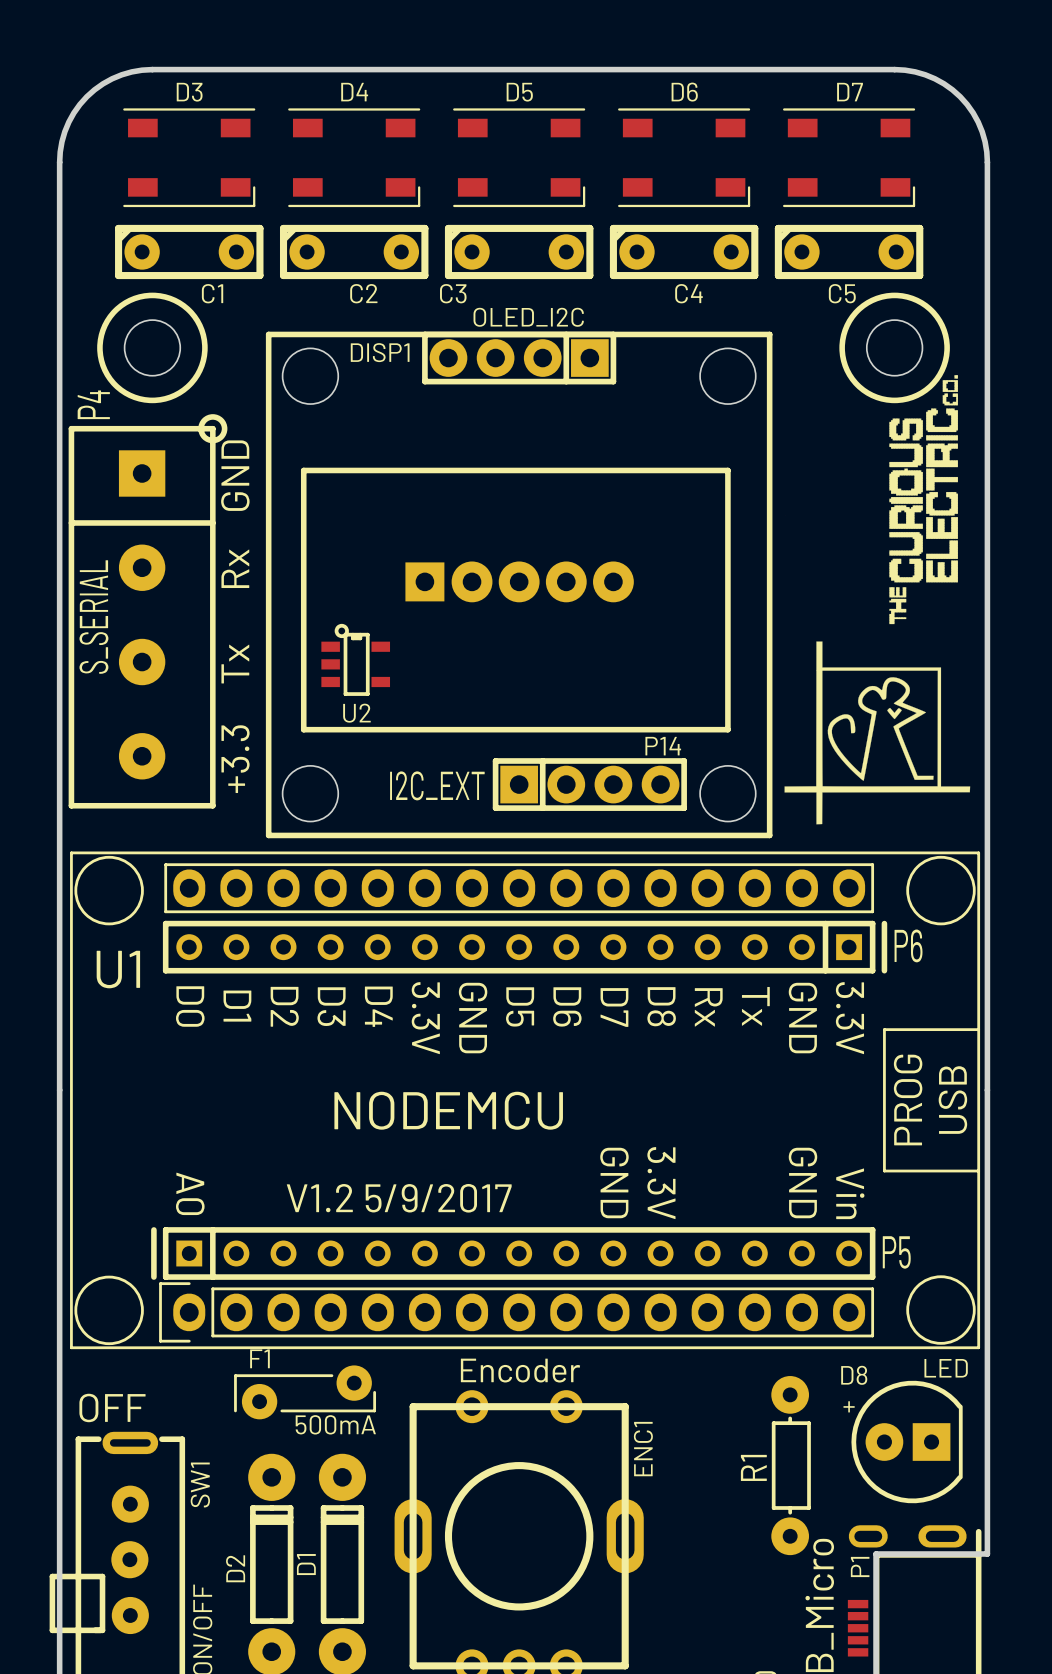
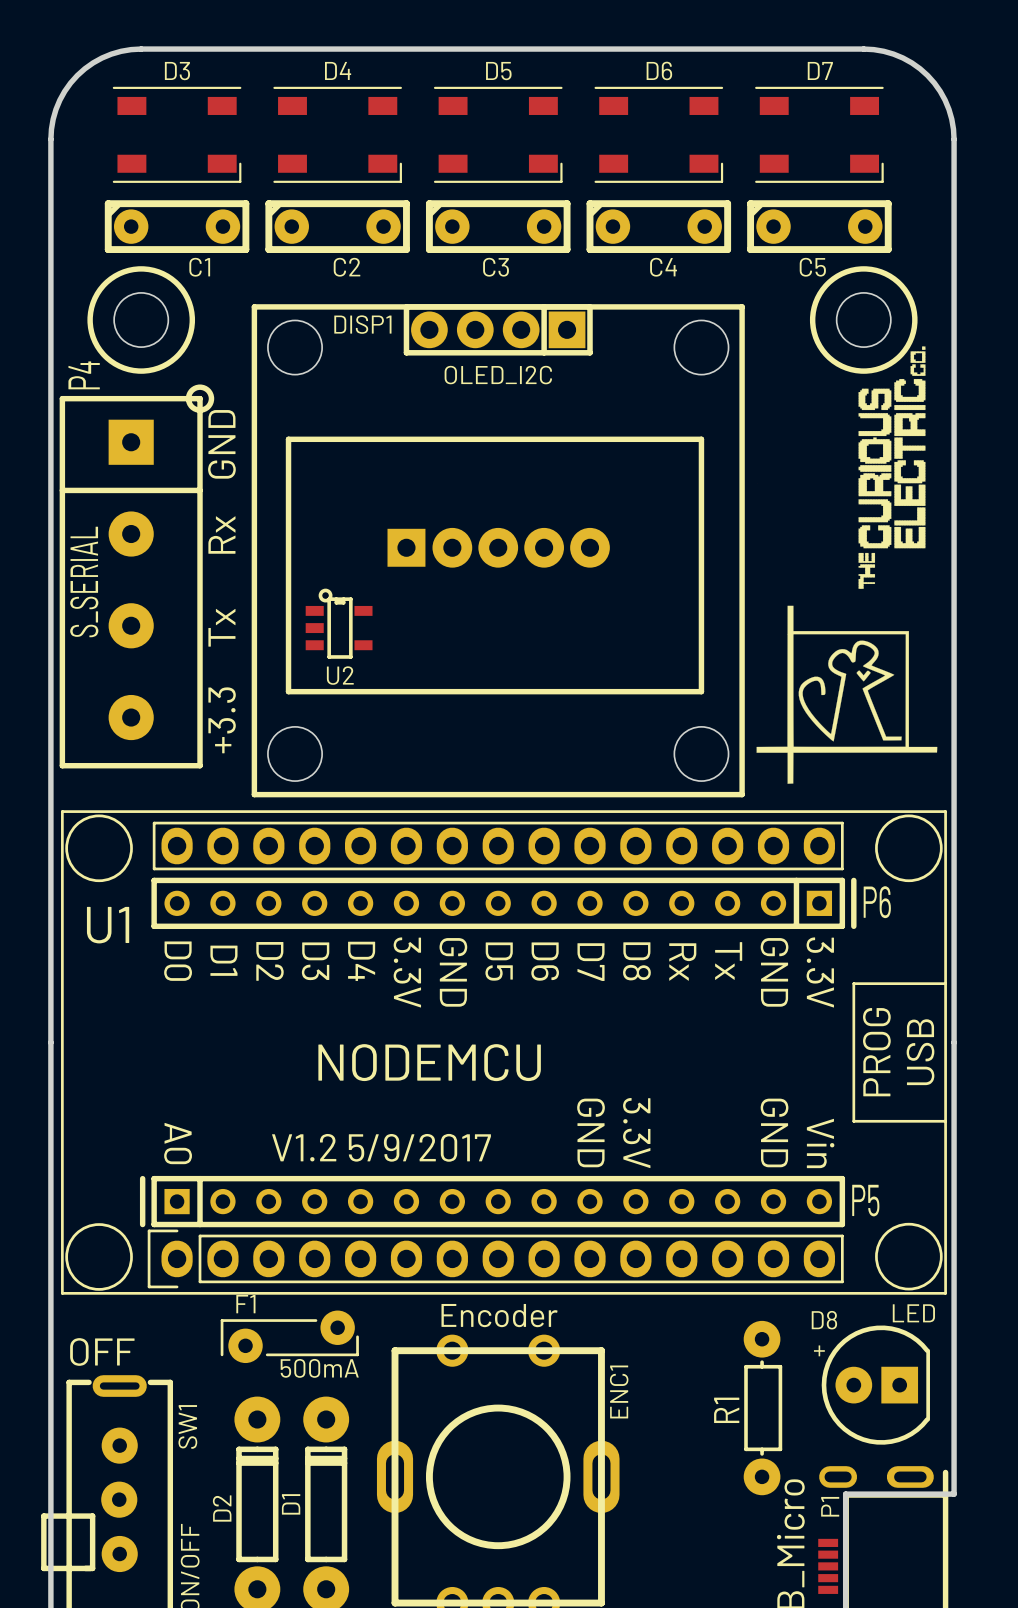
C3 name position: C3 (453, 293) -> C3 (496, 267)
DISP1 value position: OLED_I2C (528, 317) -> OLED_I2C (498, 375)
P14: I2C_EXT (589, 784) -> none

